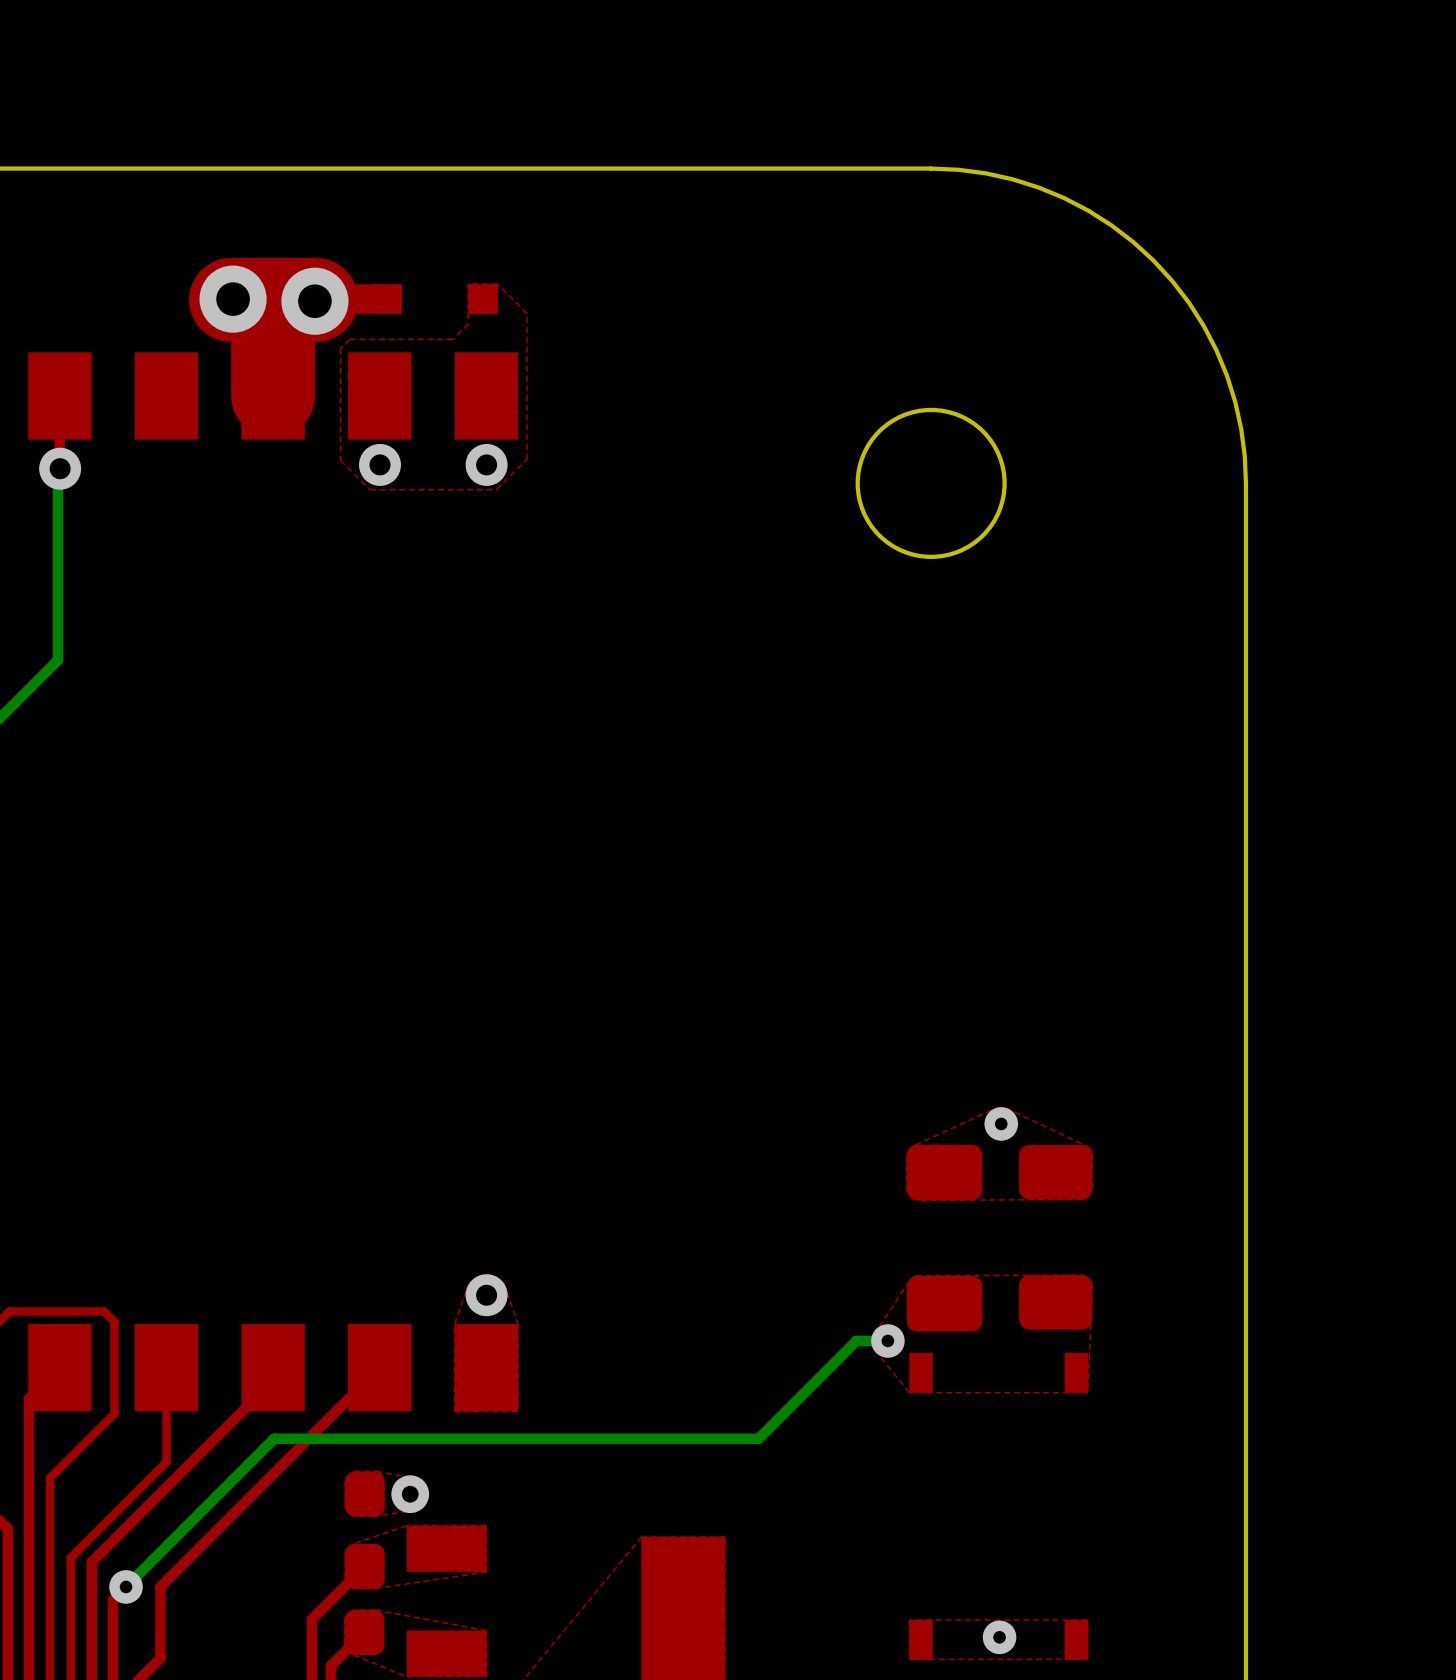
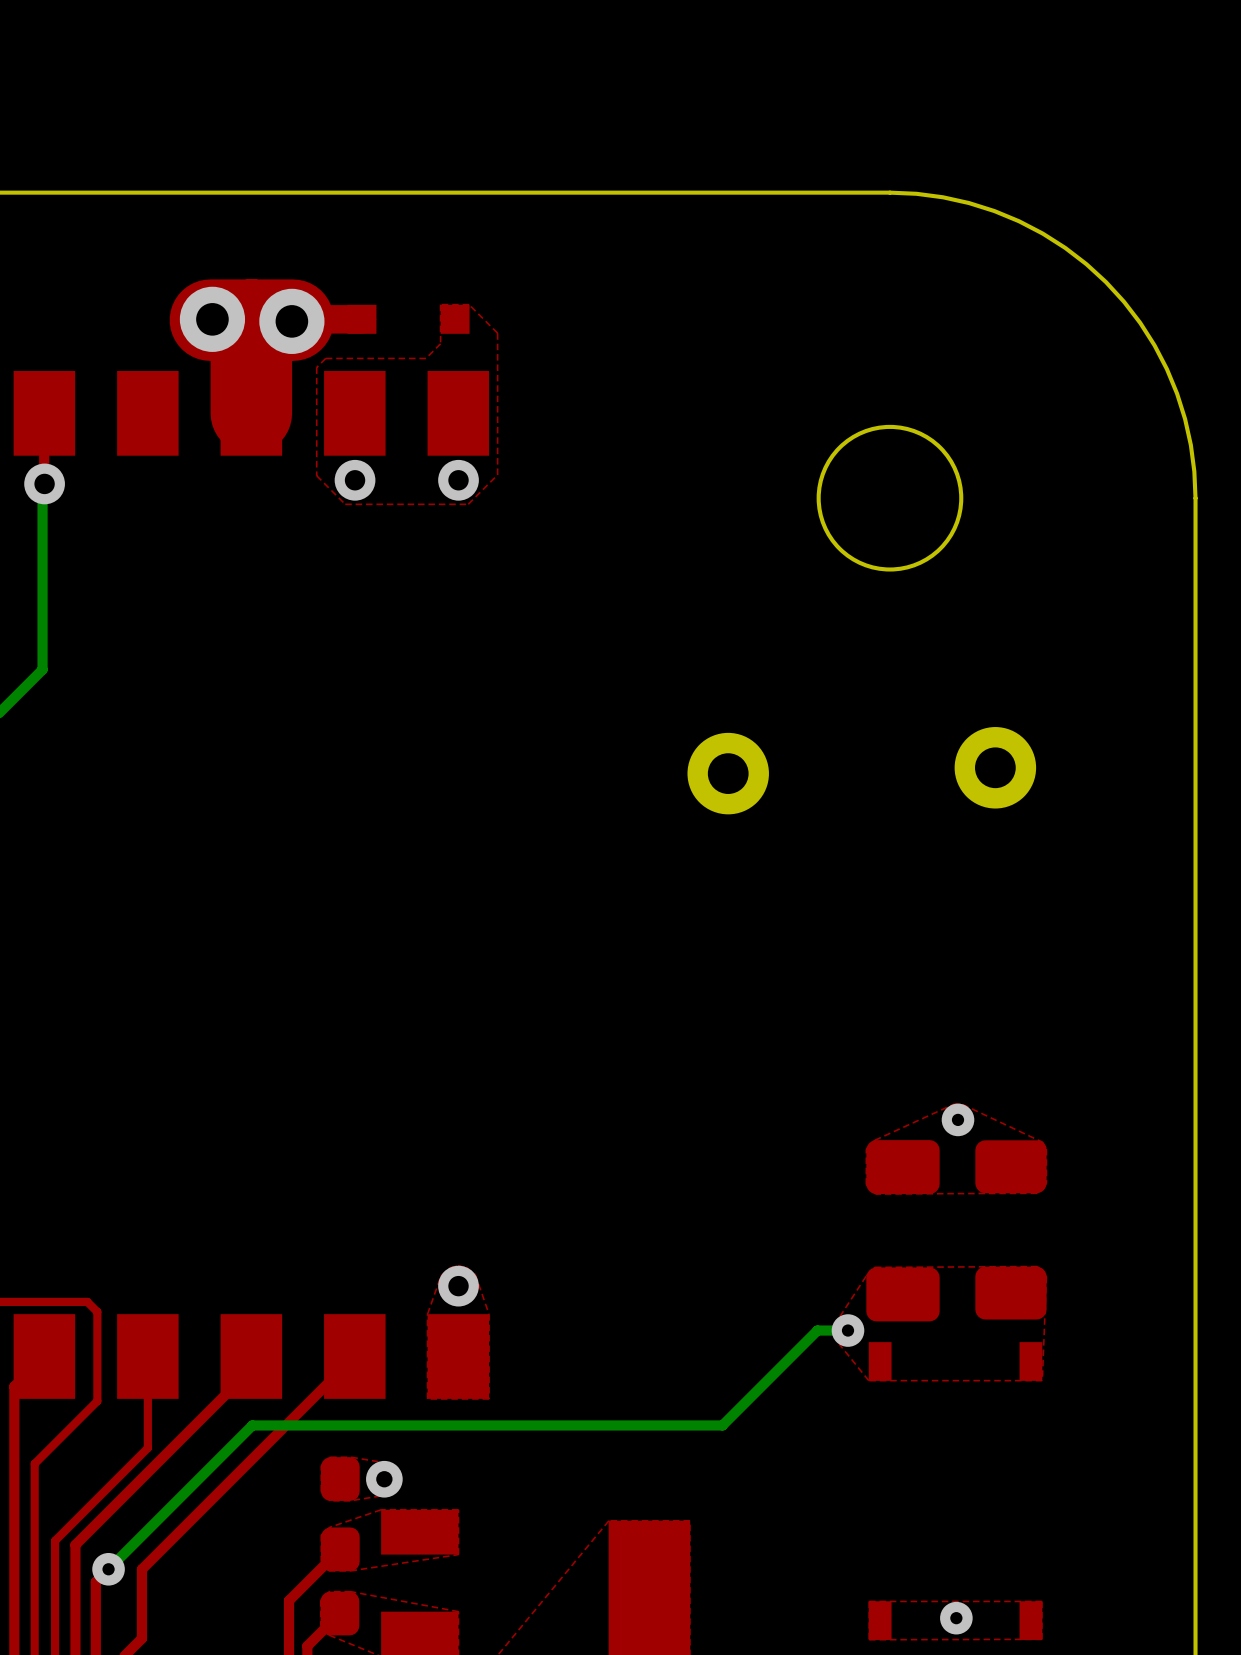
part: none -> (995, 767)
part: none -> (728, 773)

